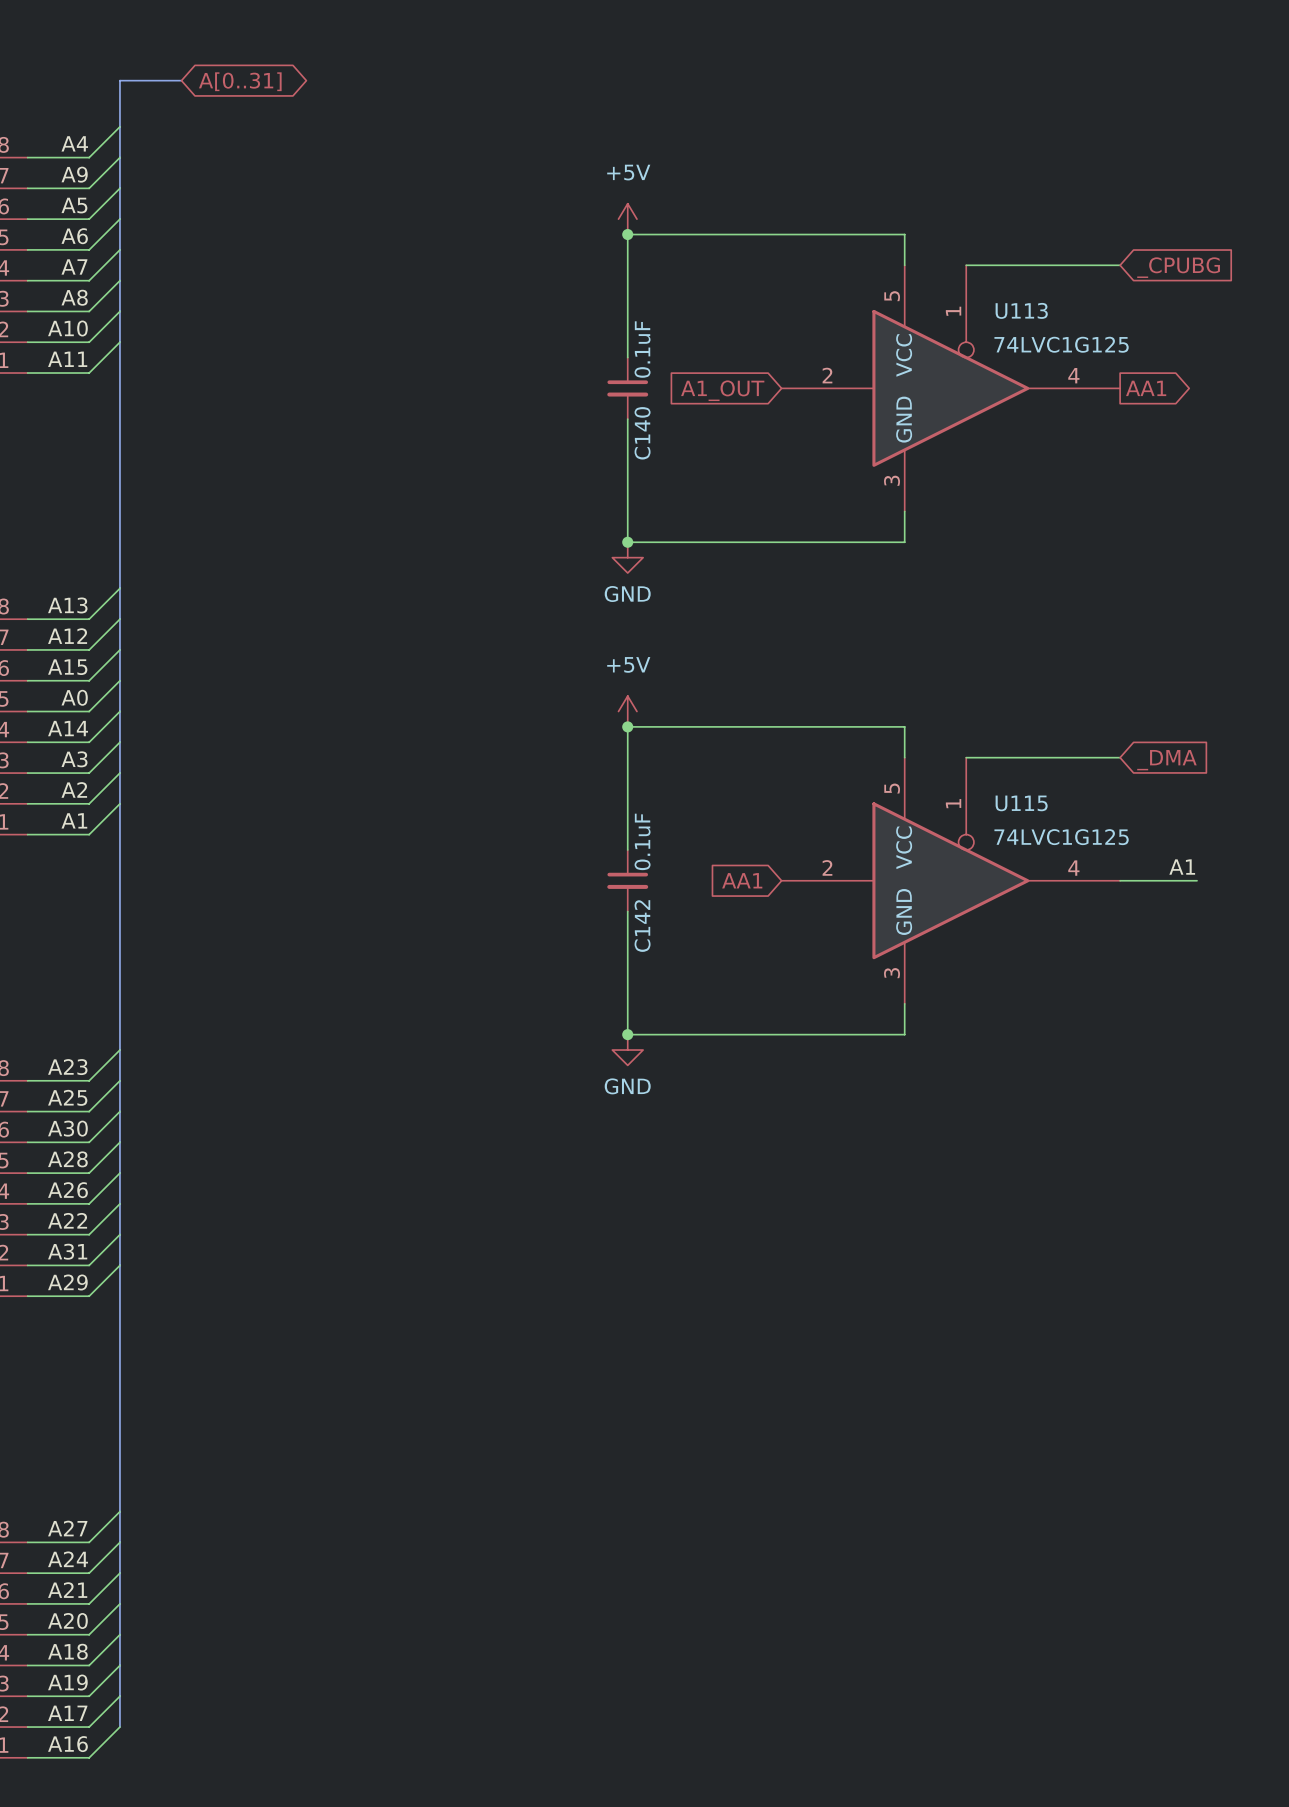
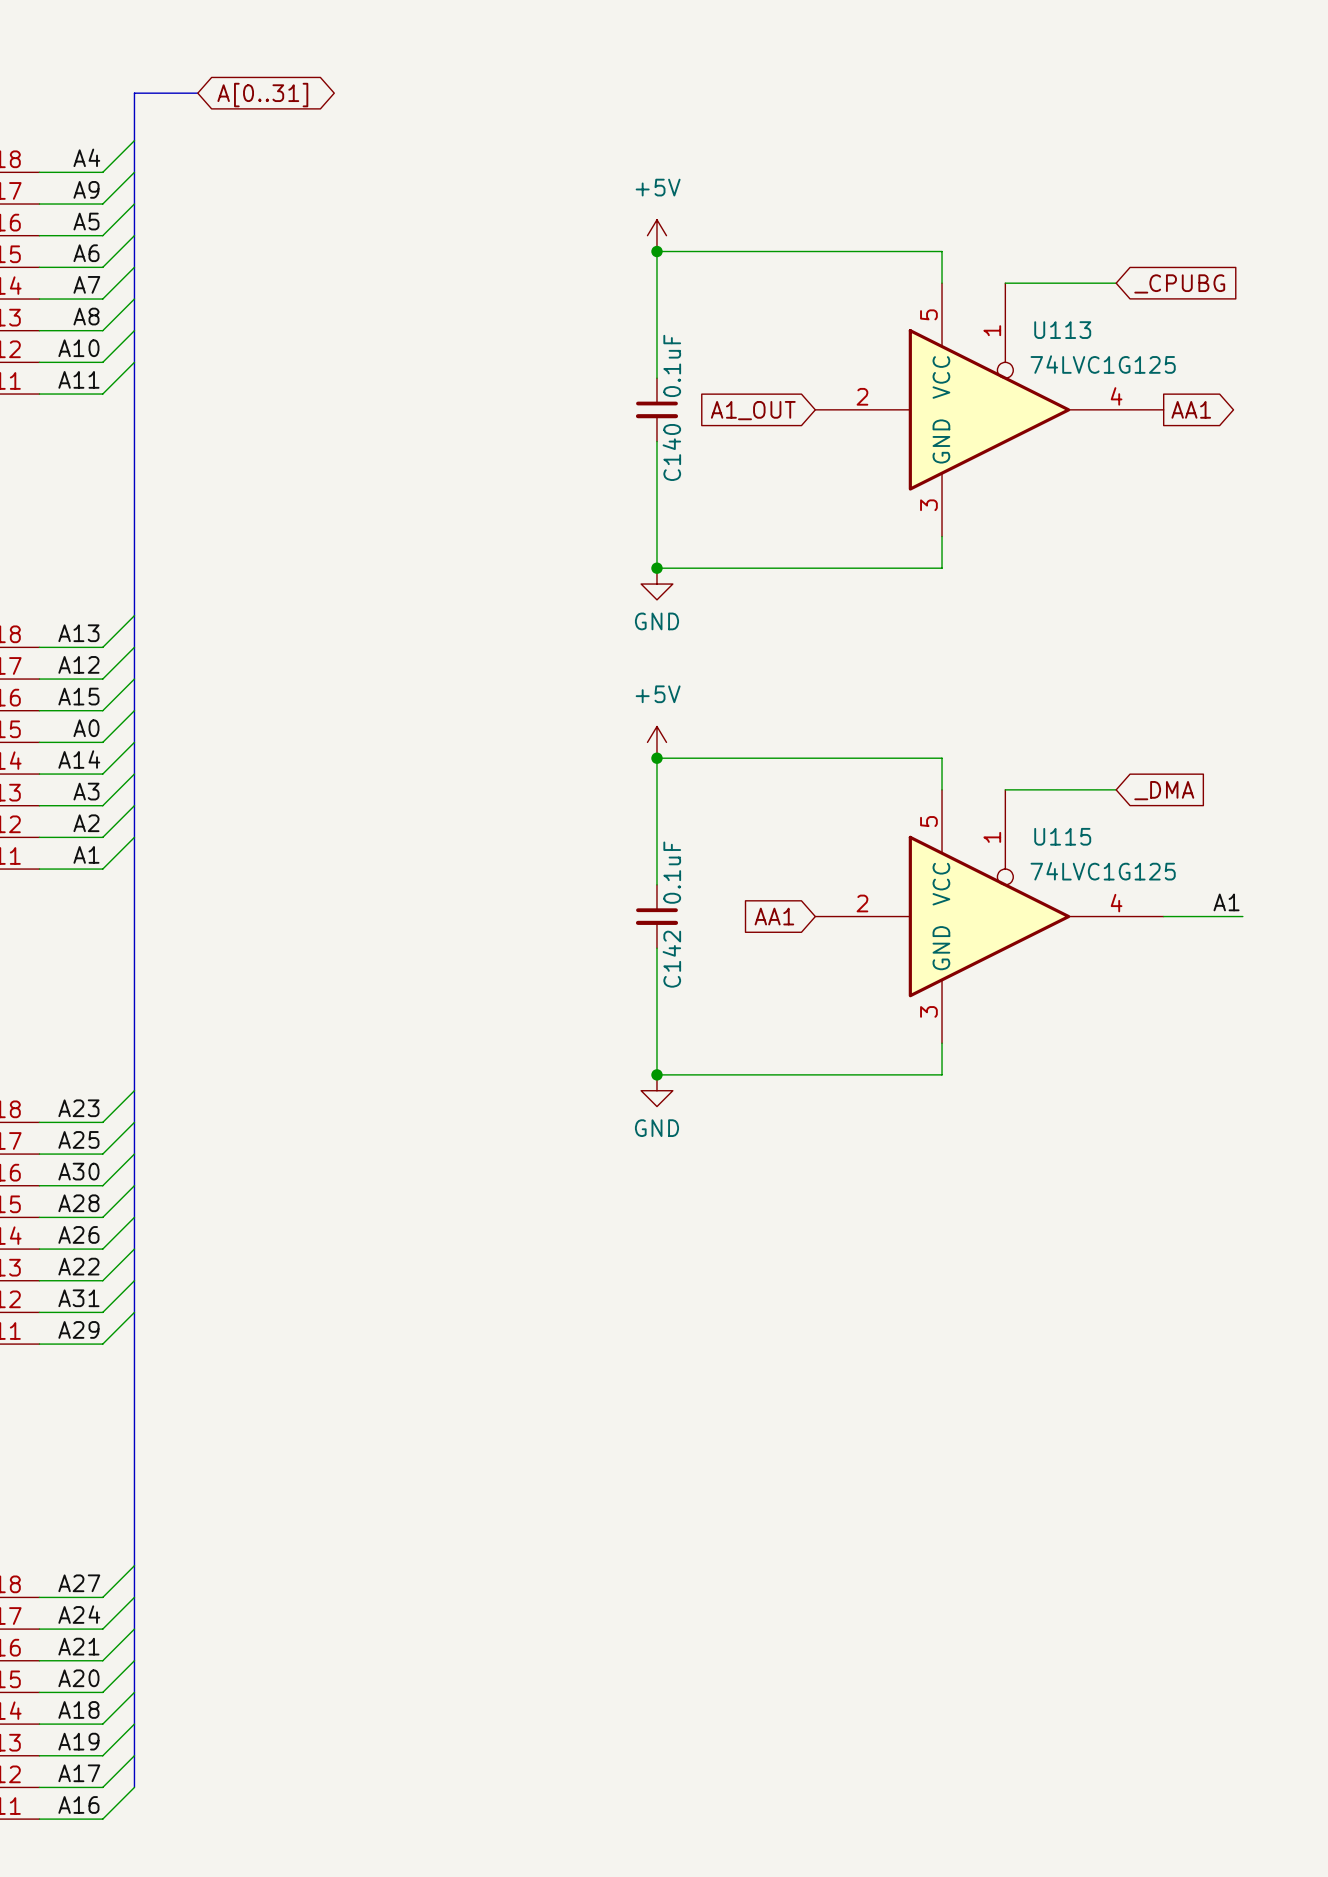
wire: (1073, 265) (1120, 265) -> none
global label position: _CPUBG (1178, 267) -> _CPUBG (1179, 283)
wire: (1073, 757) (1120, 757) -> none
global label position: _DMA (1166, 760) -> _DMA (1164, 790)

